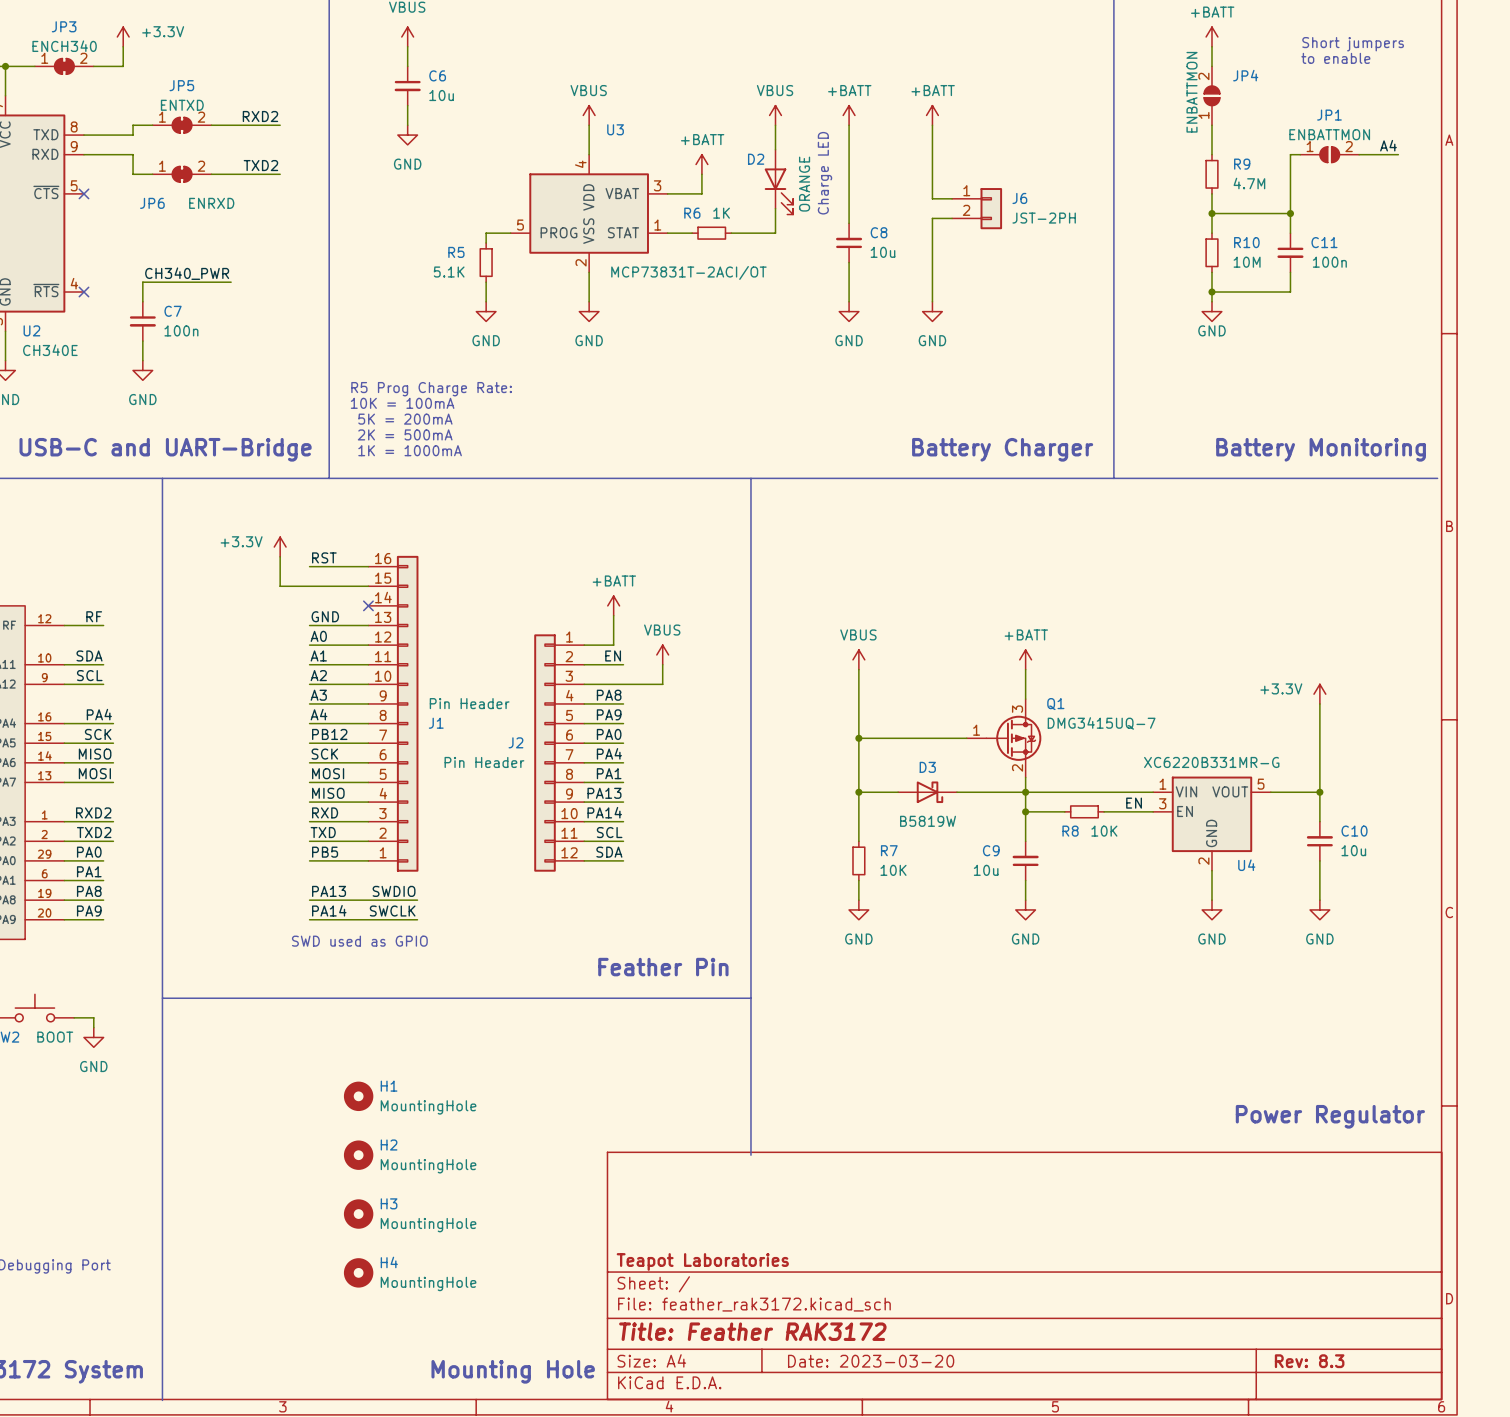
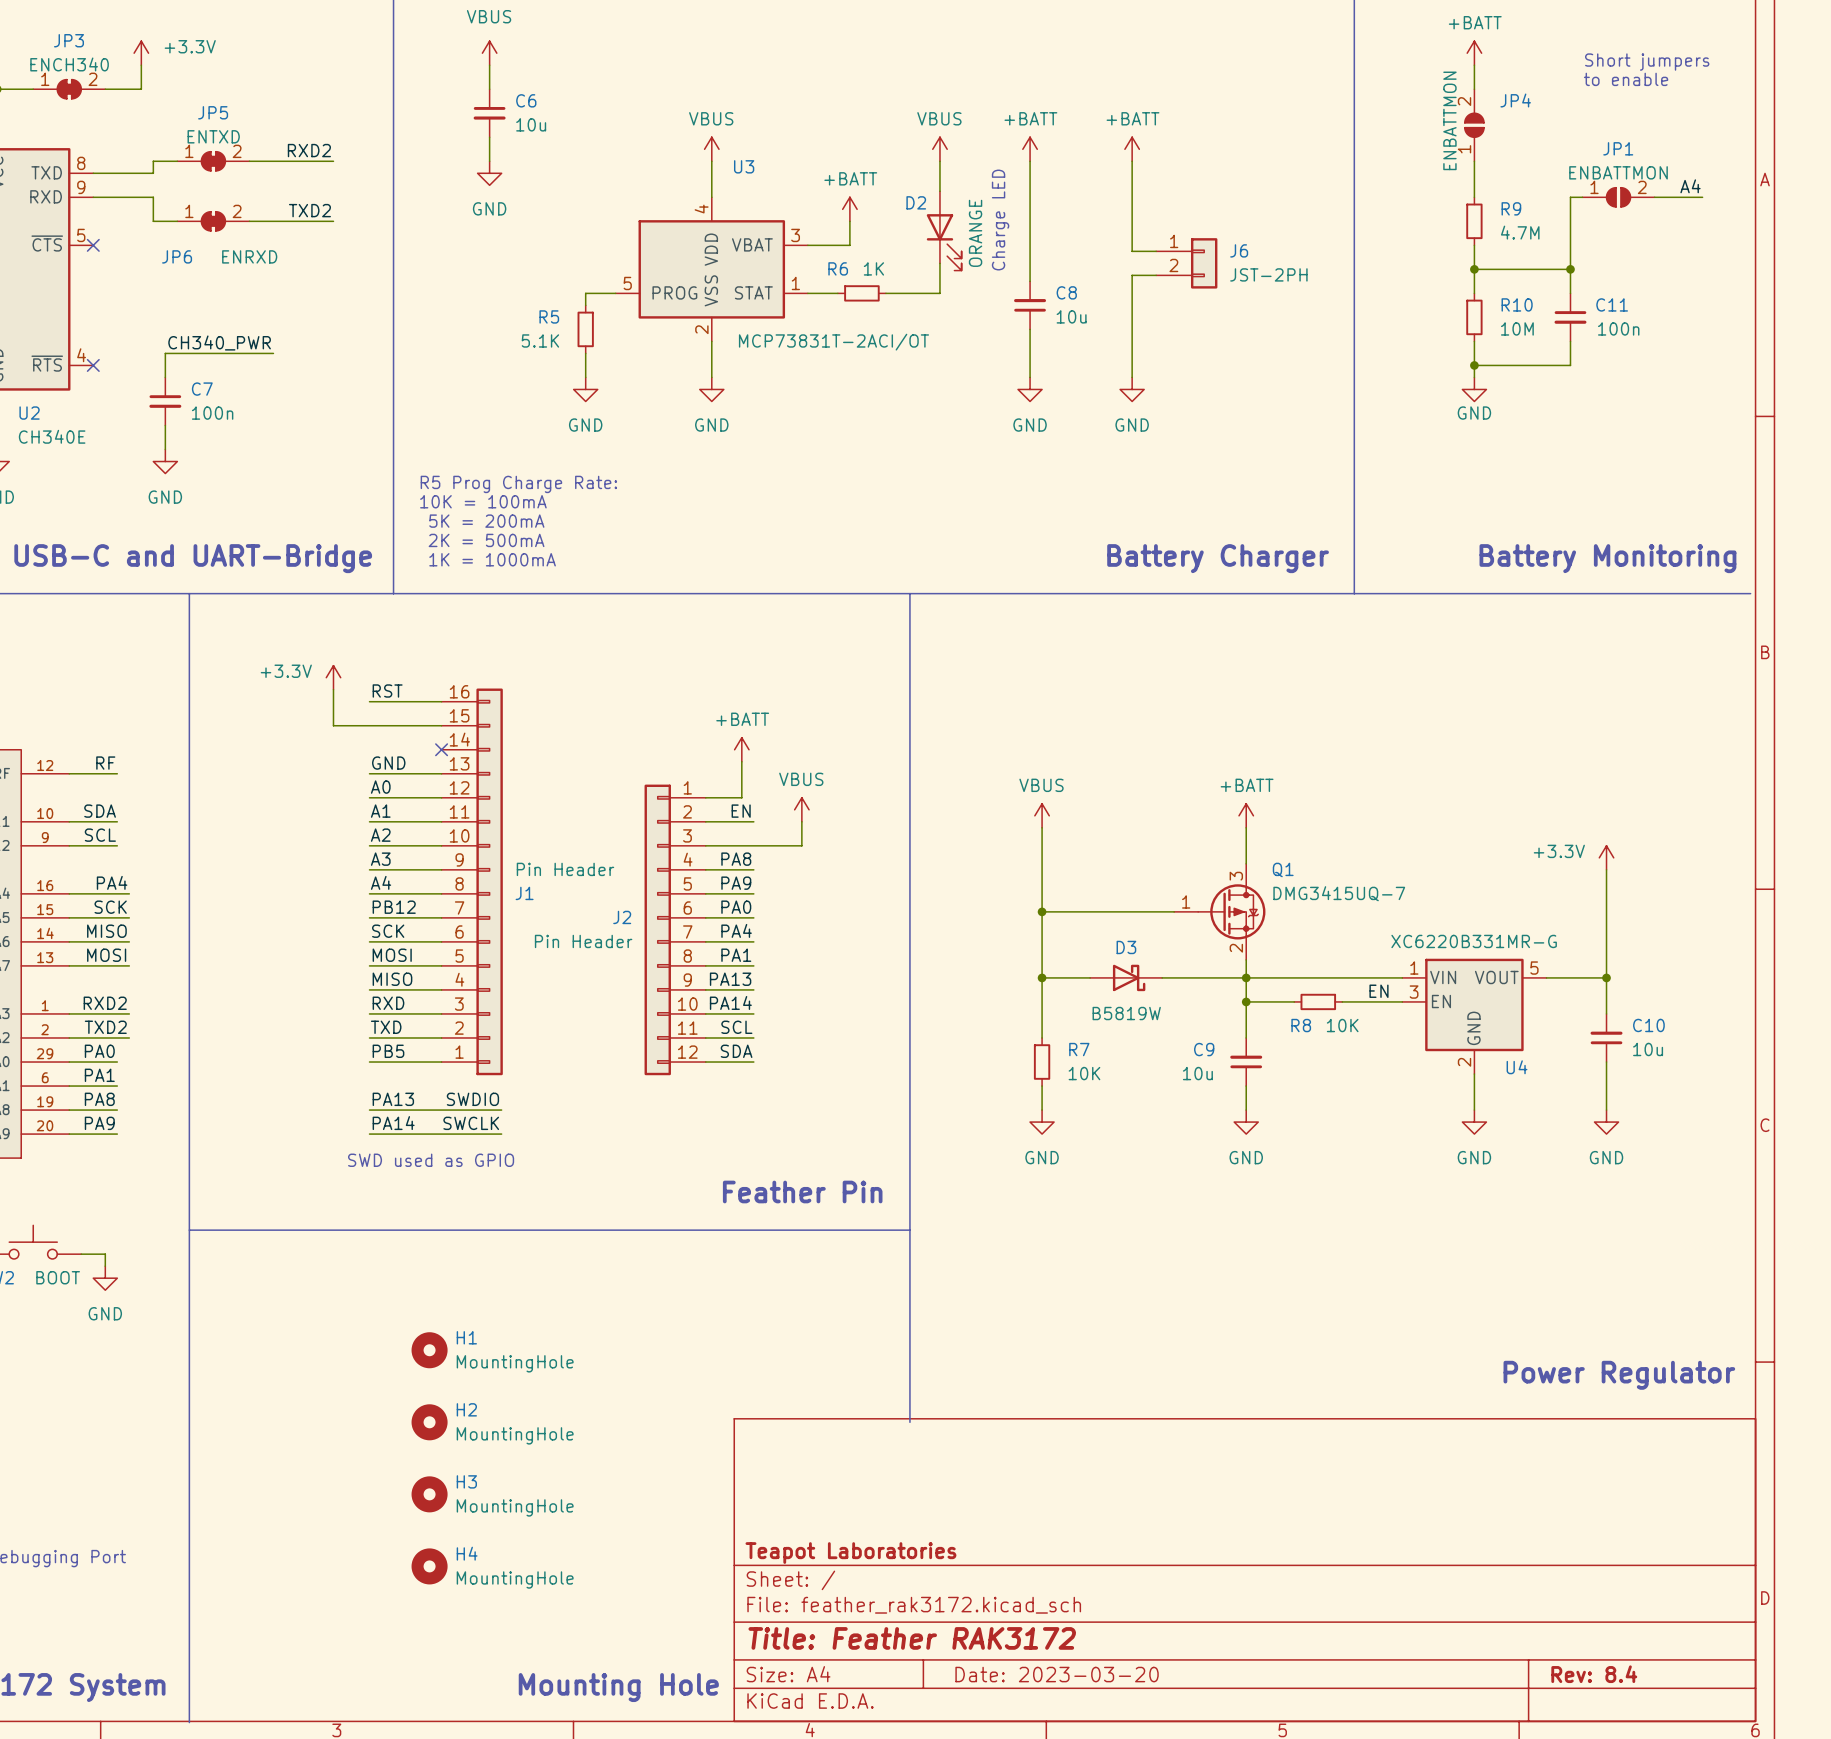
title block: Rev: 8.3 (1309, 1361) -> Rev: 8.4 (1594, 1674)

